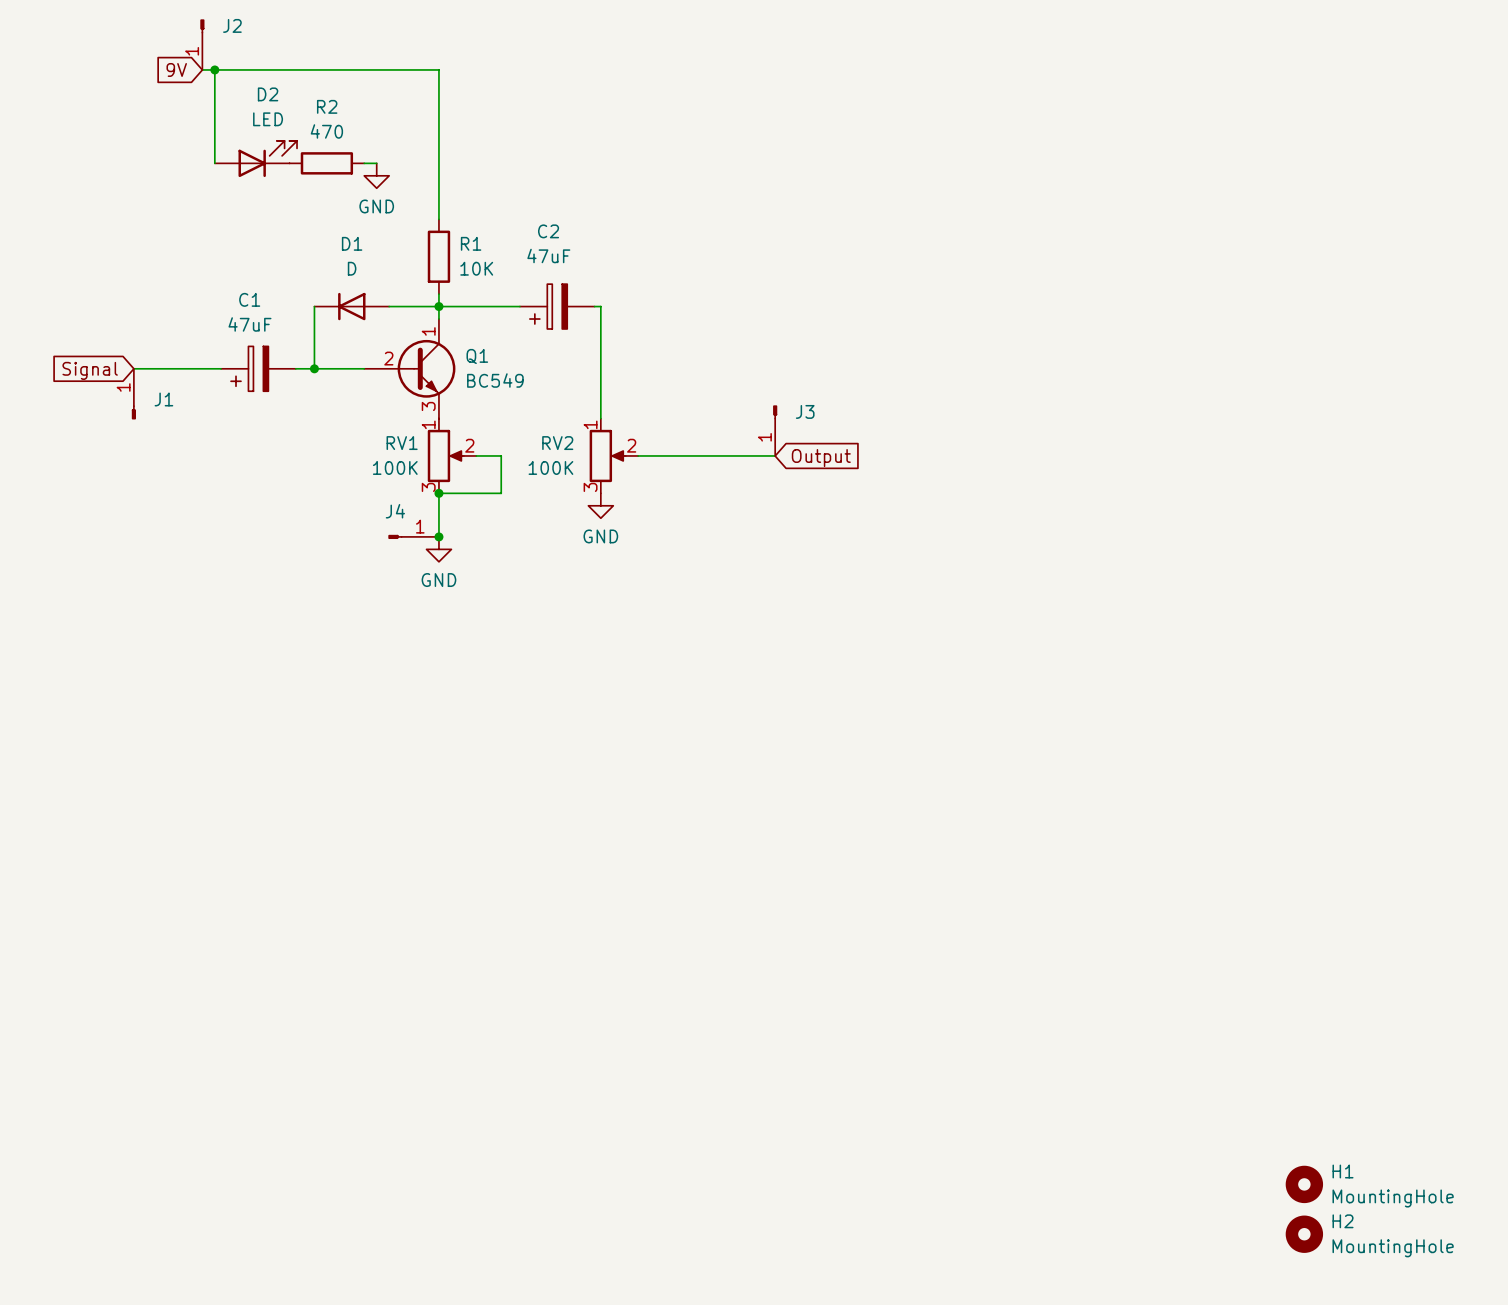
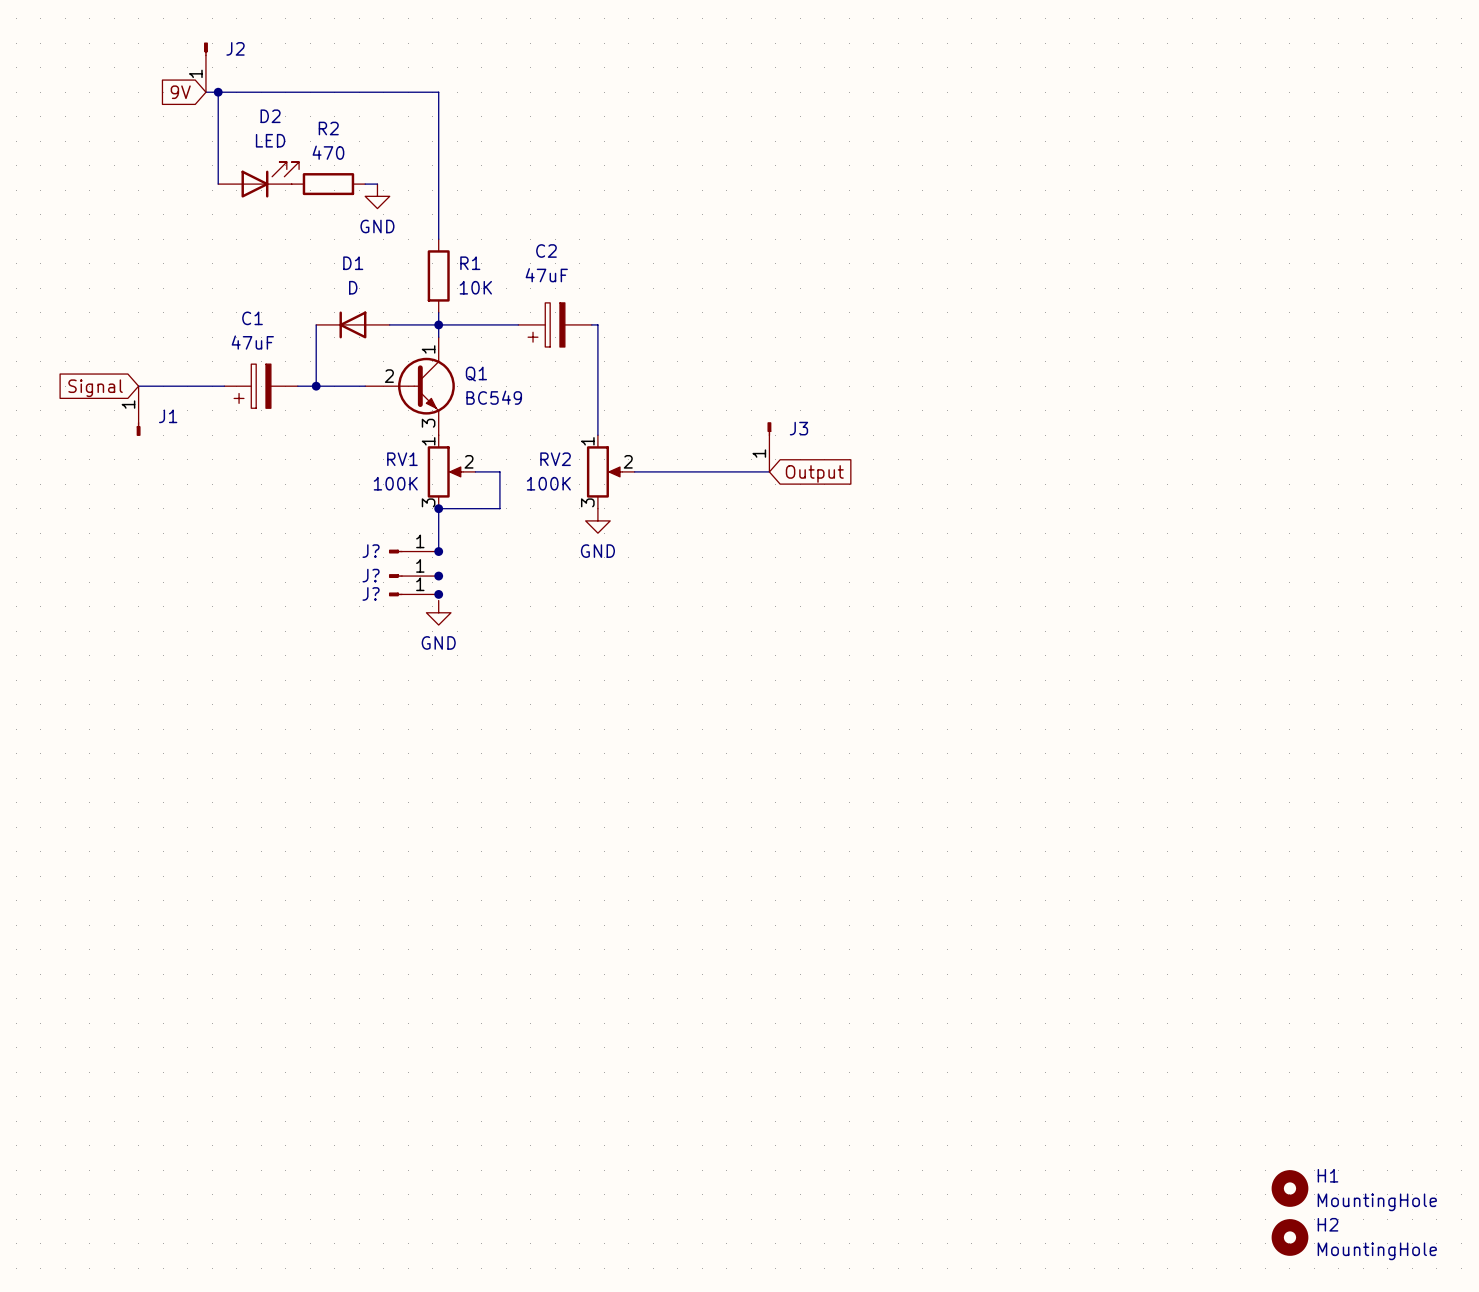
J4 name: J4 (395, 511) -> J? (371, 551)
power symbol position: GND (438, 549) -> GND (438, 612)
J?: none -> (413, 576)
junction: none -> (438, 576)
J?: none -> (413, 594)
junction: none -> (438, 594)

